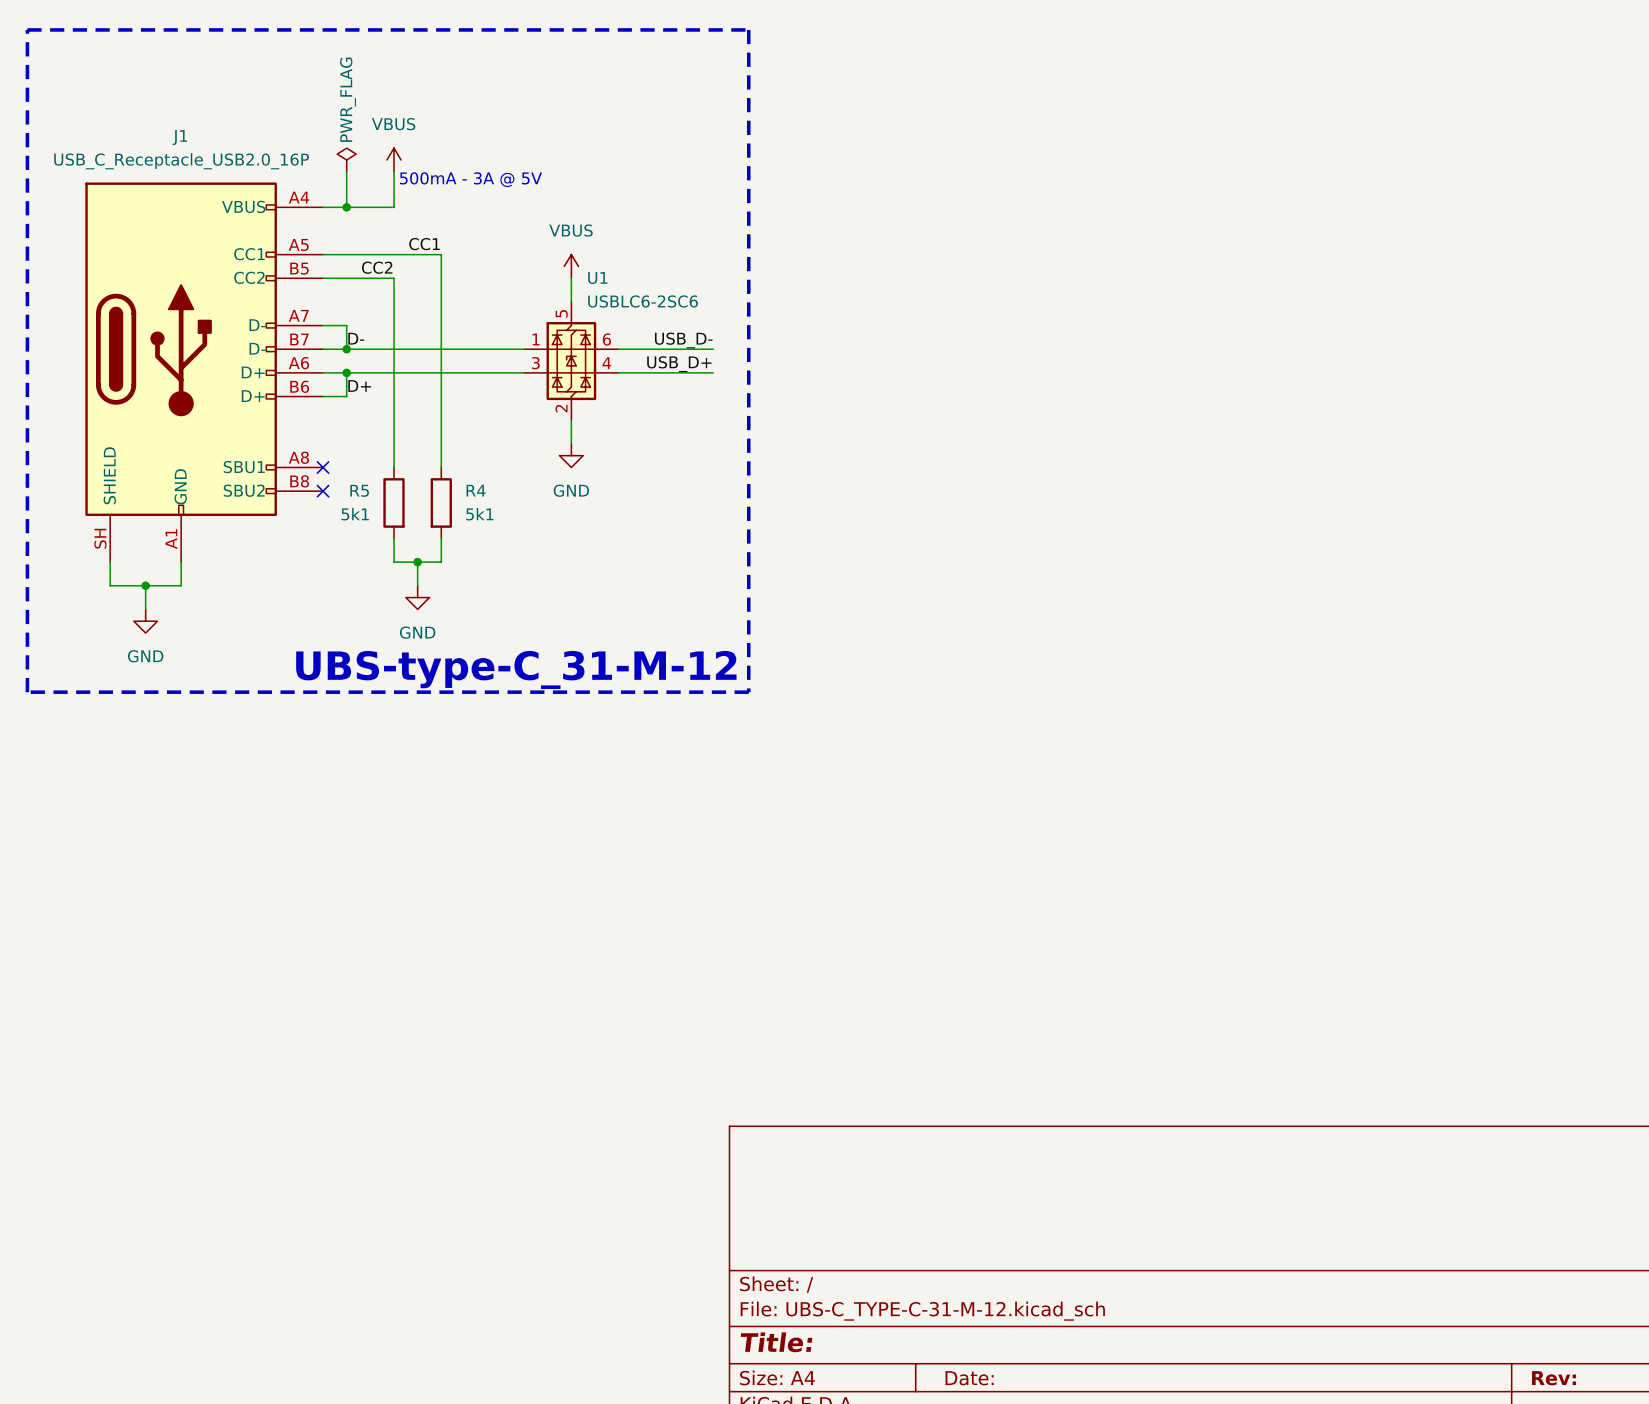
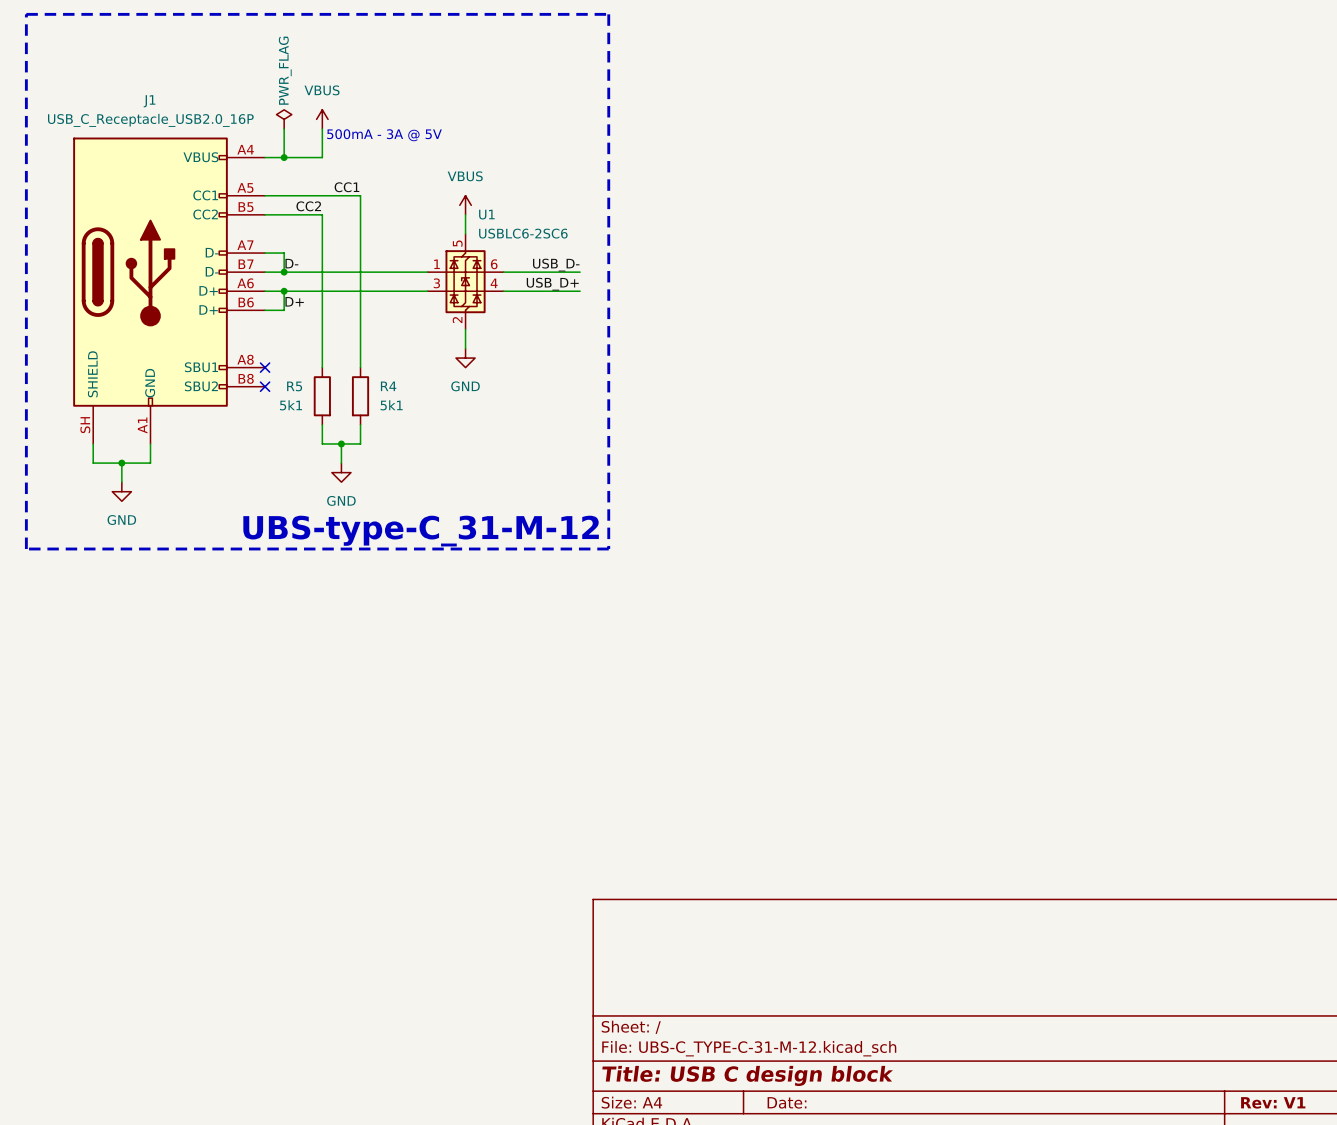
title block: Title: (776, 1342) -> Title: USB C design block (747, 1075)
title block: Rev: (1554, 1378) -> Rev: V1 (1273, 1102)

